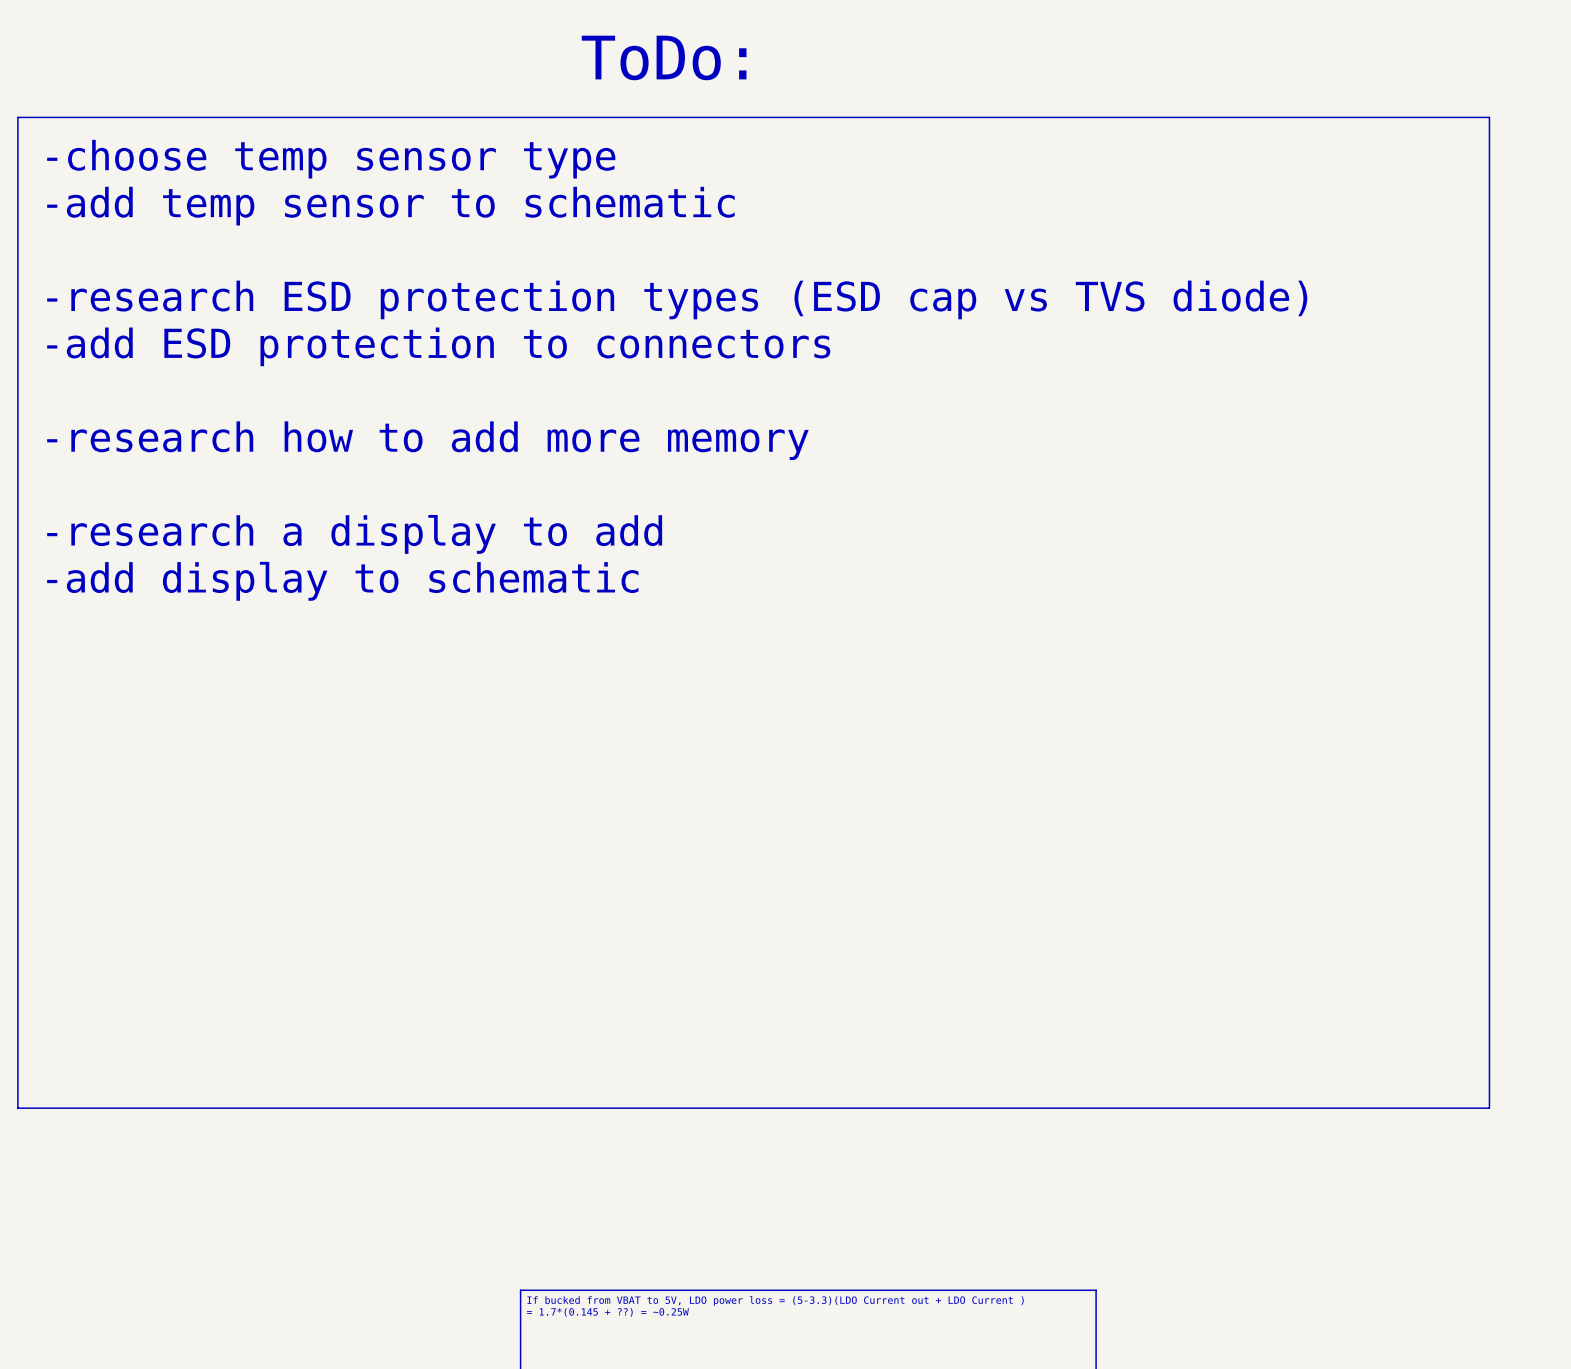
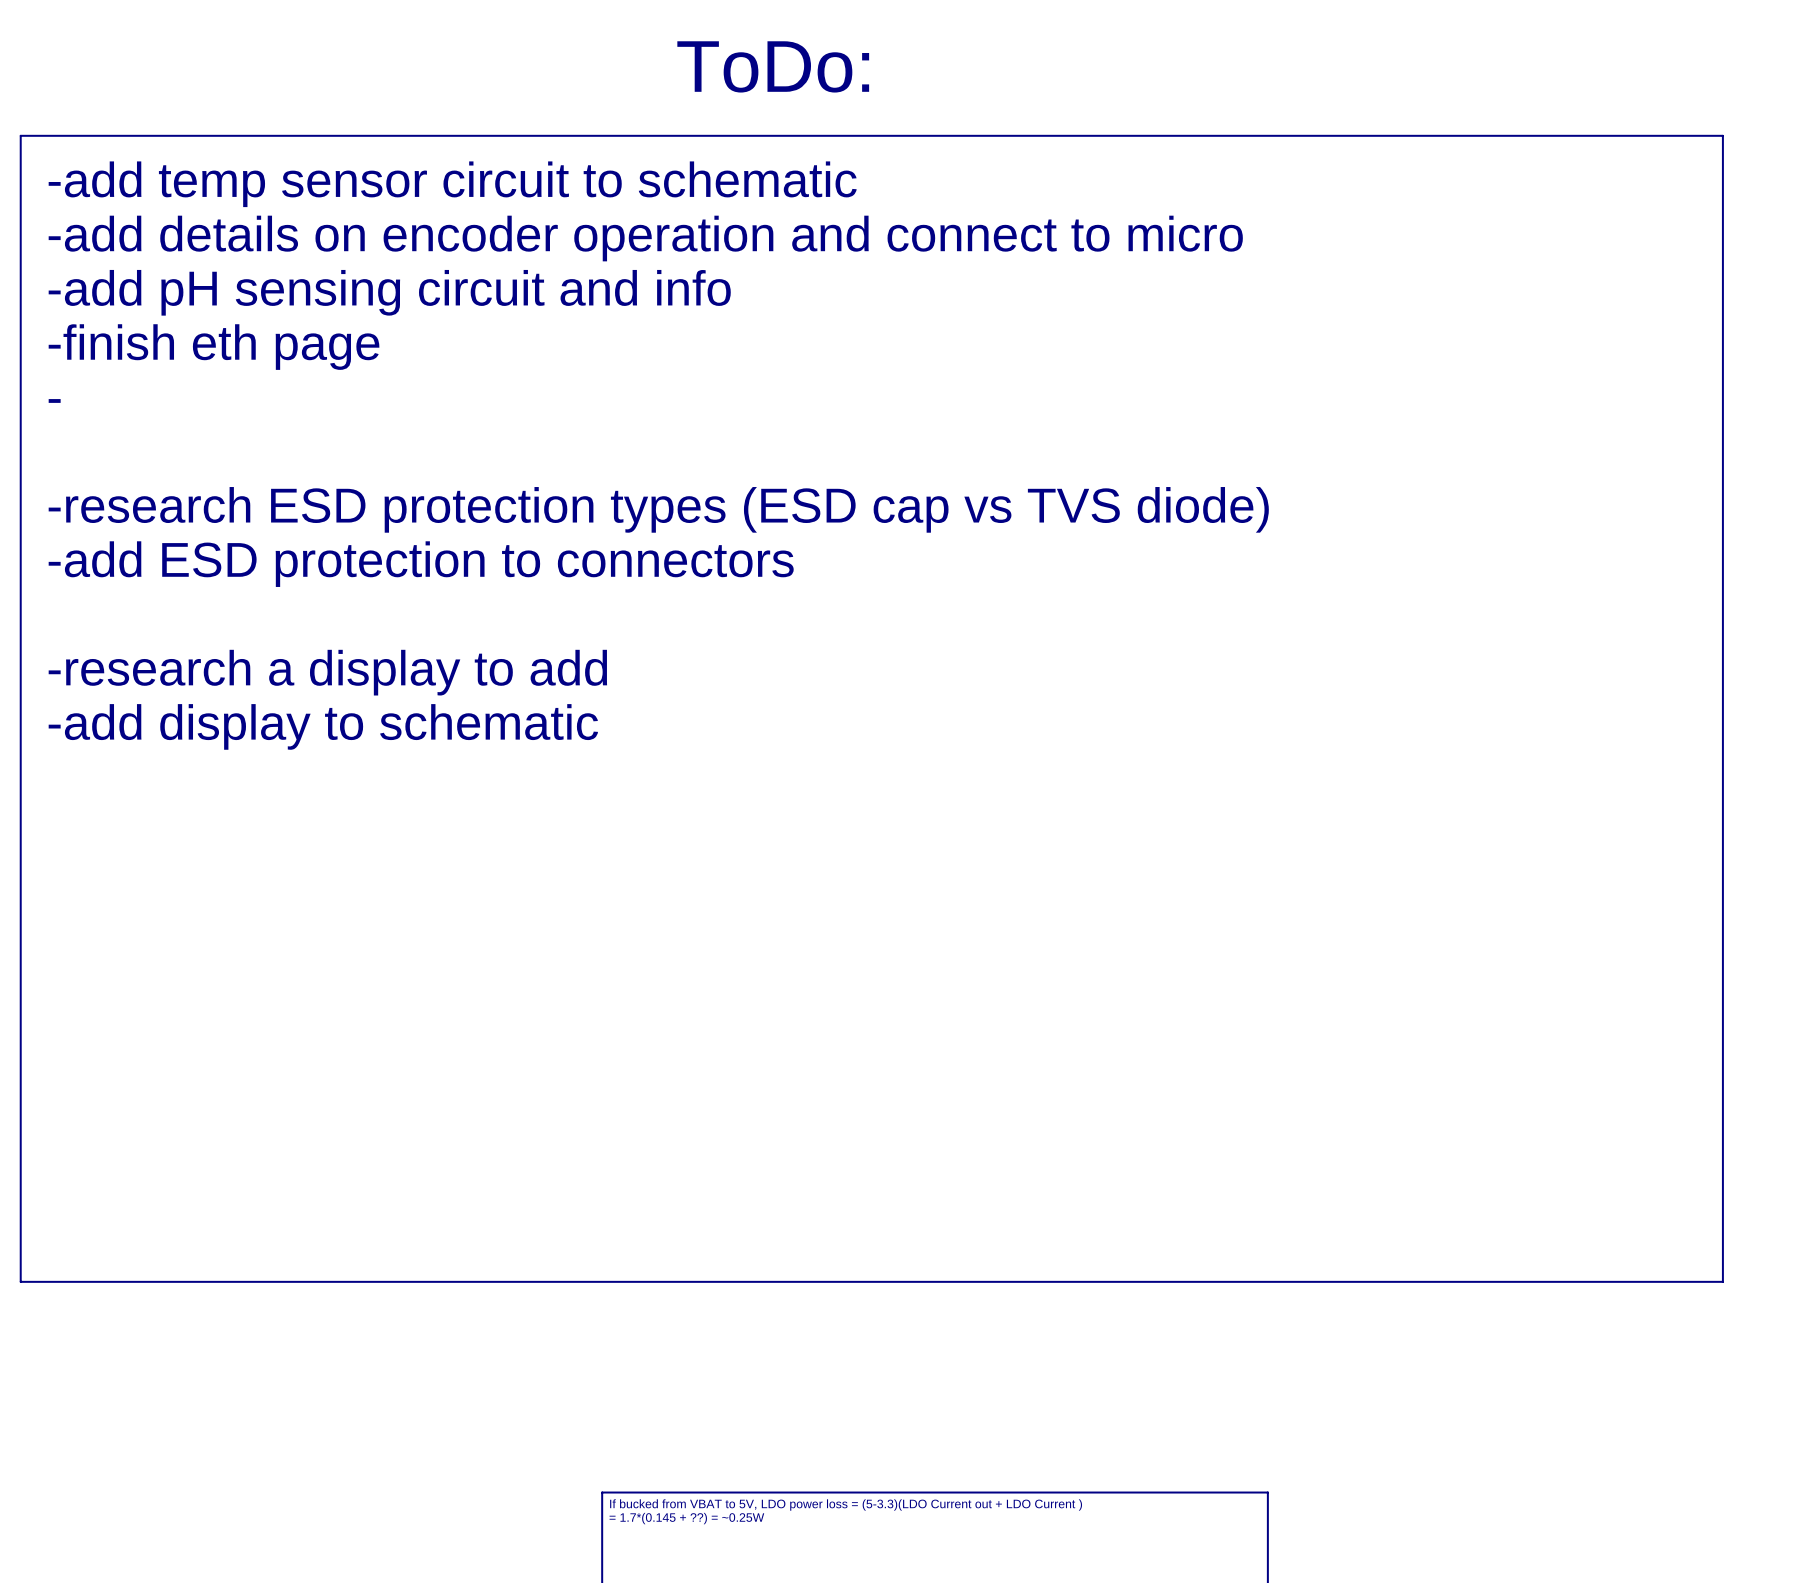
text: -choose temp sensor type (331, 159) -> -add temp sensor circuit to schematic (452, 184)
text: -add temp sensor to schematic (390, 206) -> -add details on encoder operation and connect to micro (645, 238)
text: none -> -add pH sensing circuit and info (389, 292)
text: -research ESD protection types (ESD cap vs TVS diode) (677, 299) -> -finish eth page (214, 347)
text: -add ESD protection to connectors (438, 346) -> - (54, 400)
text: -research how to add more memory (427, 440) -> -research ESD protection types (ESD cap vs TVS diode) (658, 509)
text: none -> -add ESD protection to connectors (421, 564)
text: -research a display to add (354, 534) -> none
text: -add display to schematic (342, 581) -> -research a display to add (327, 672)
text: none -> -add display to schematic (323, 726)

